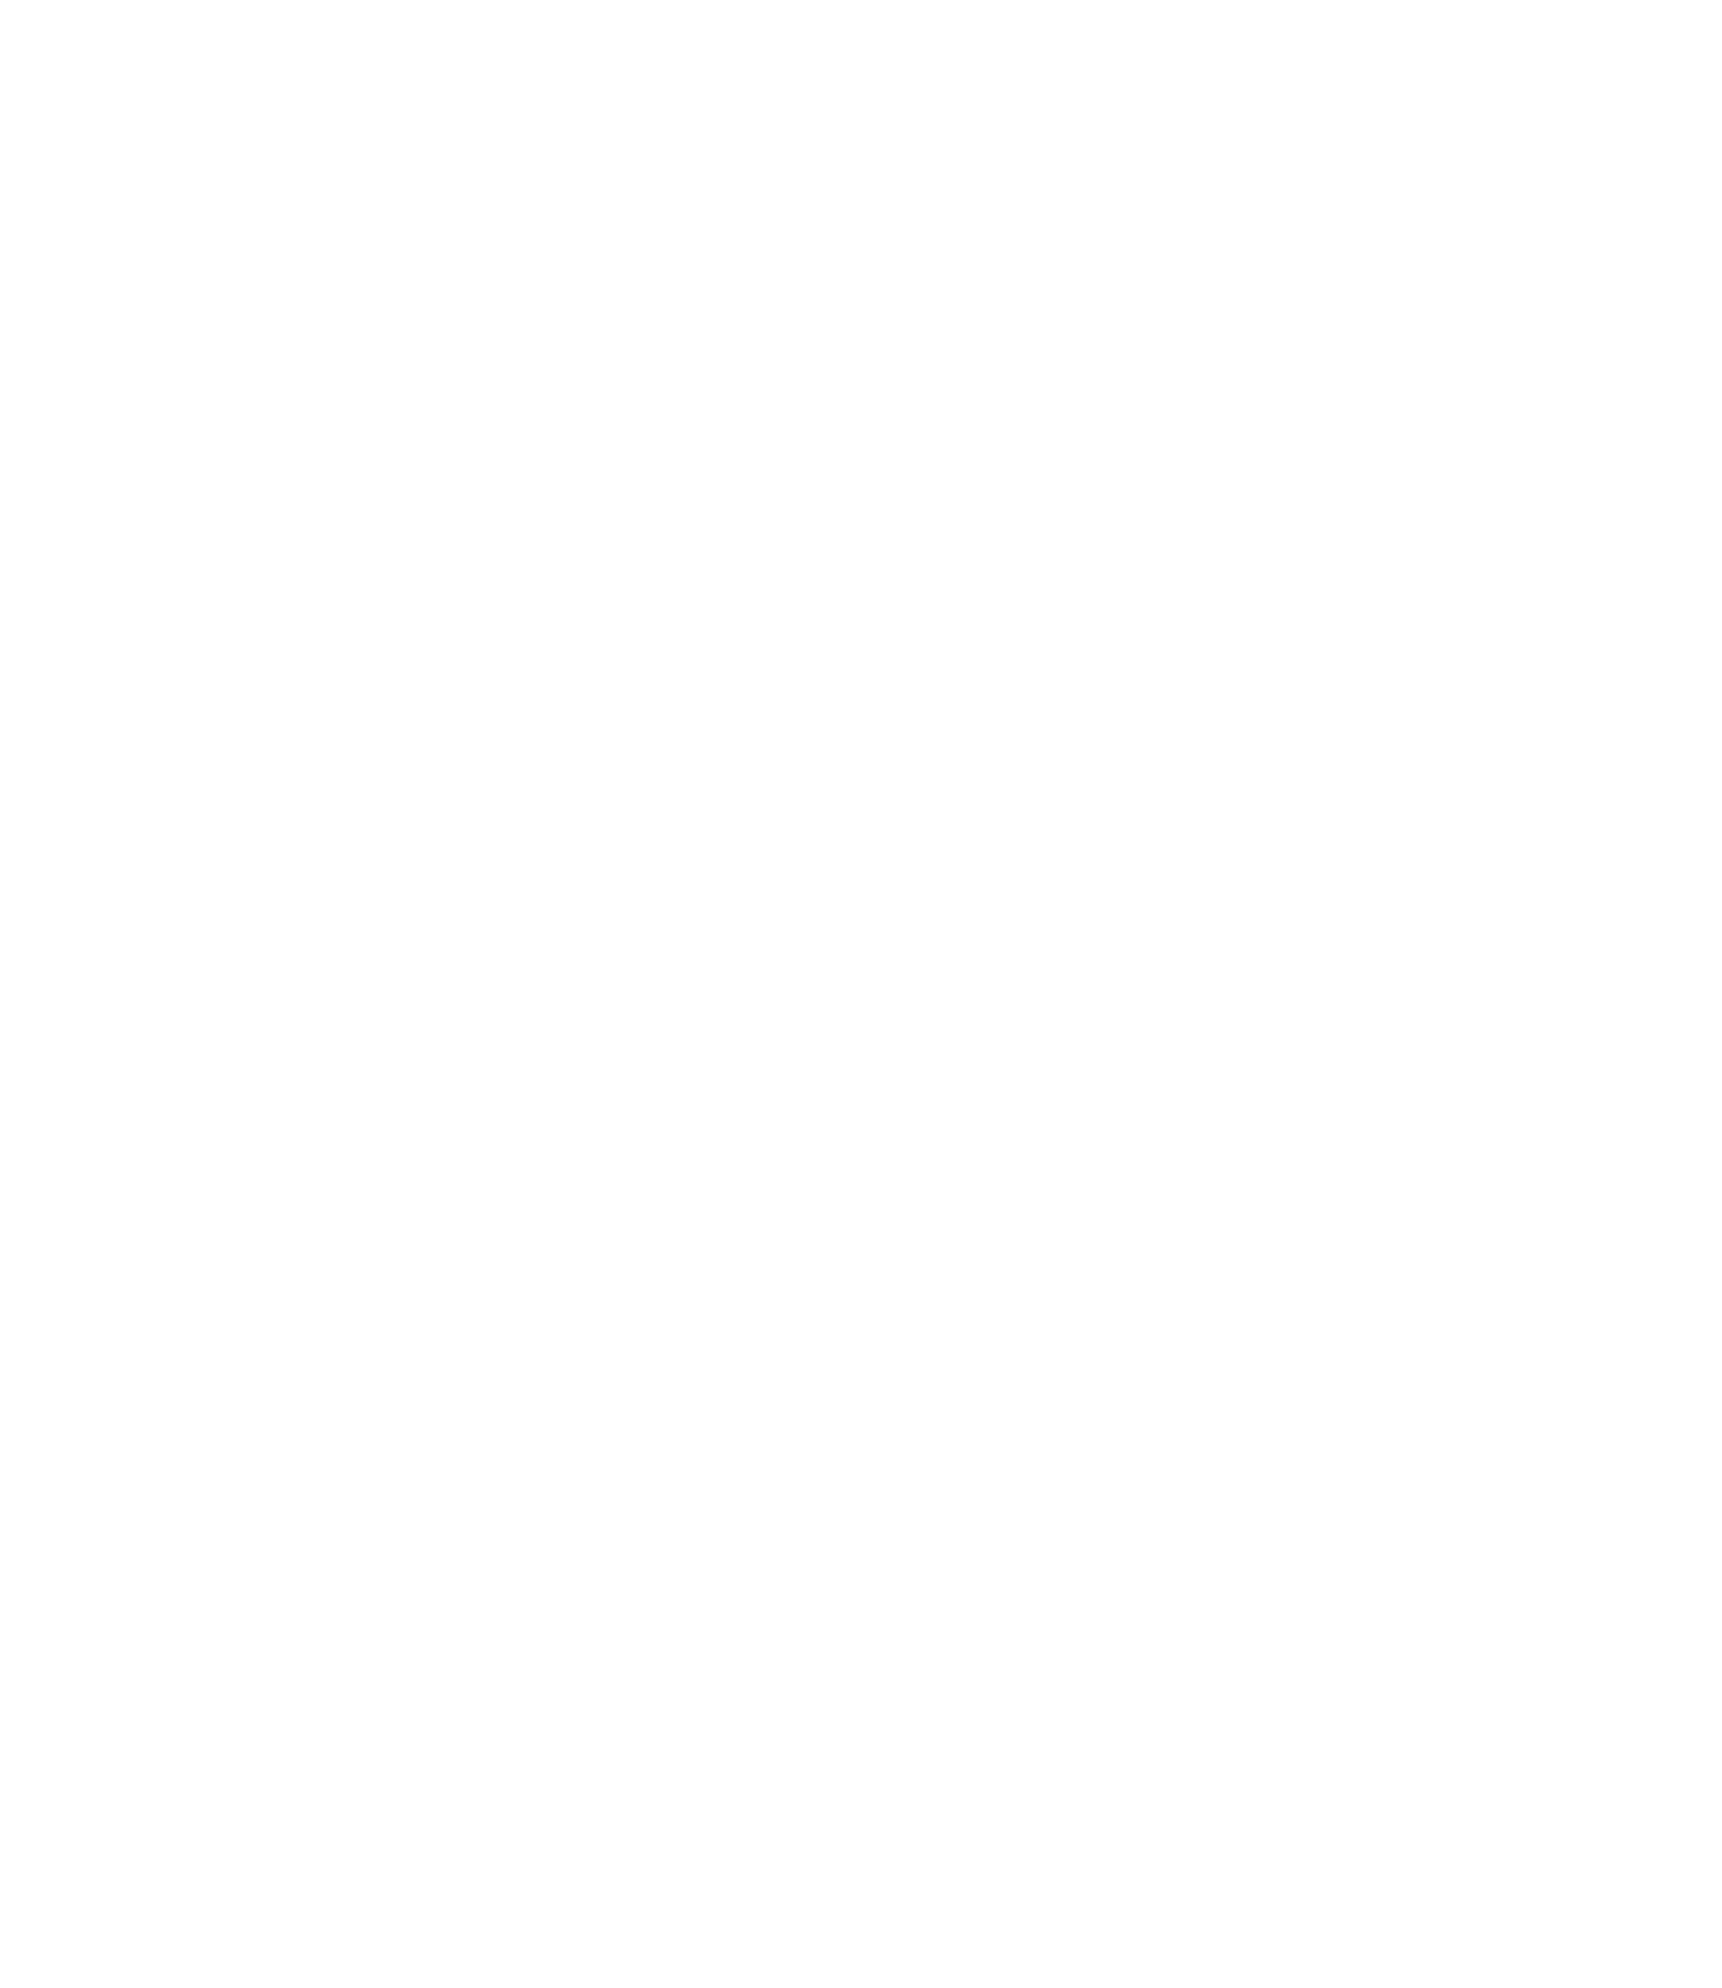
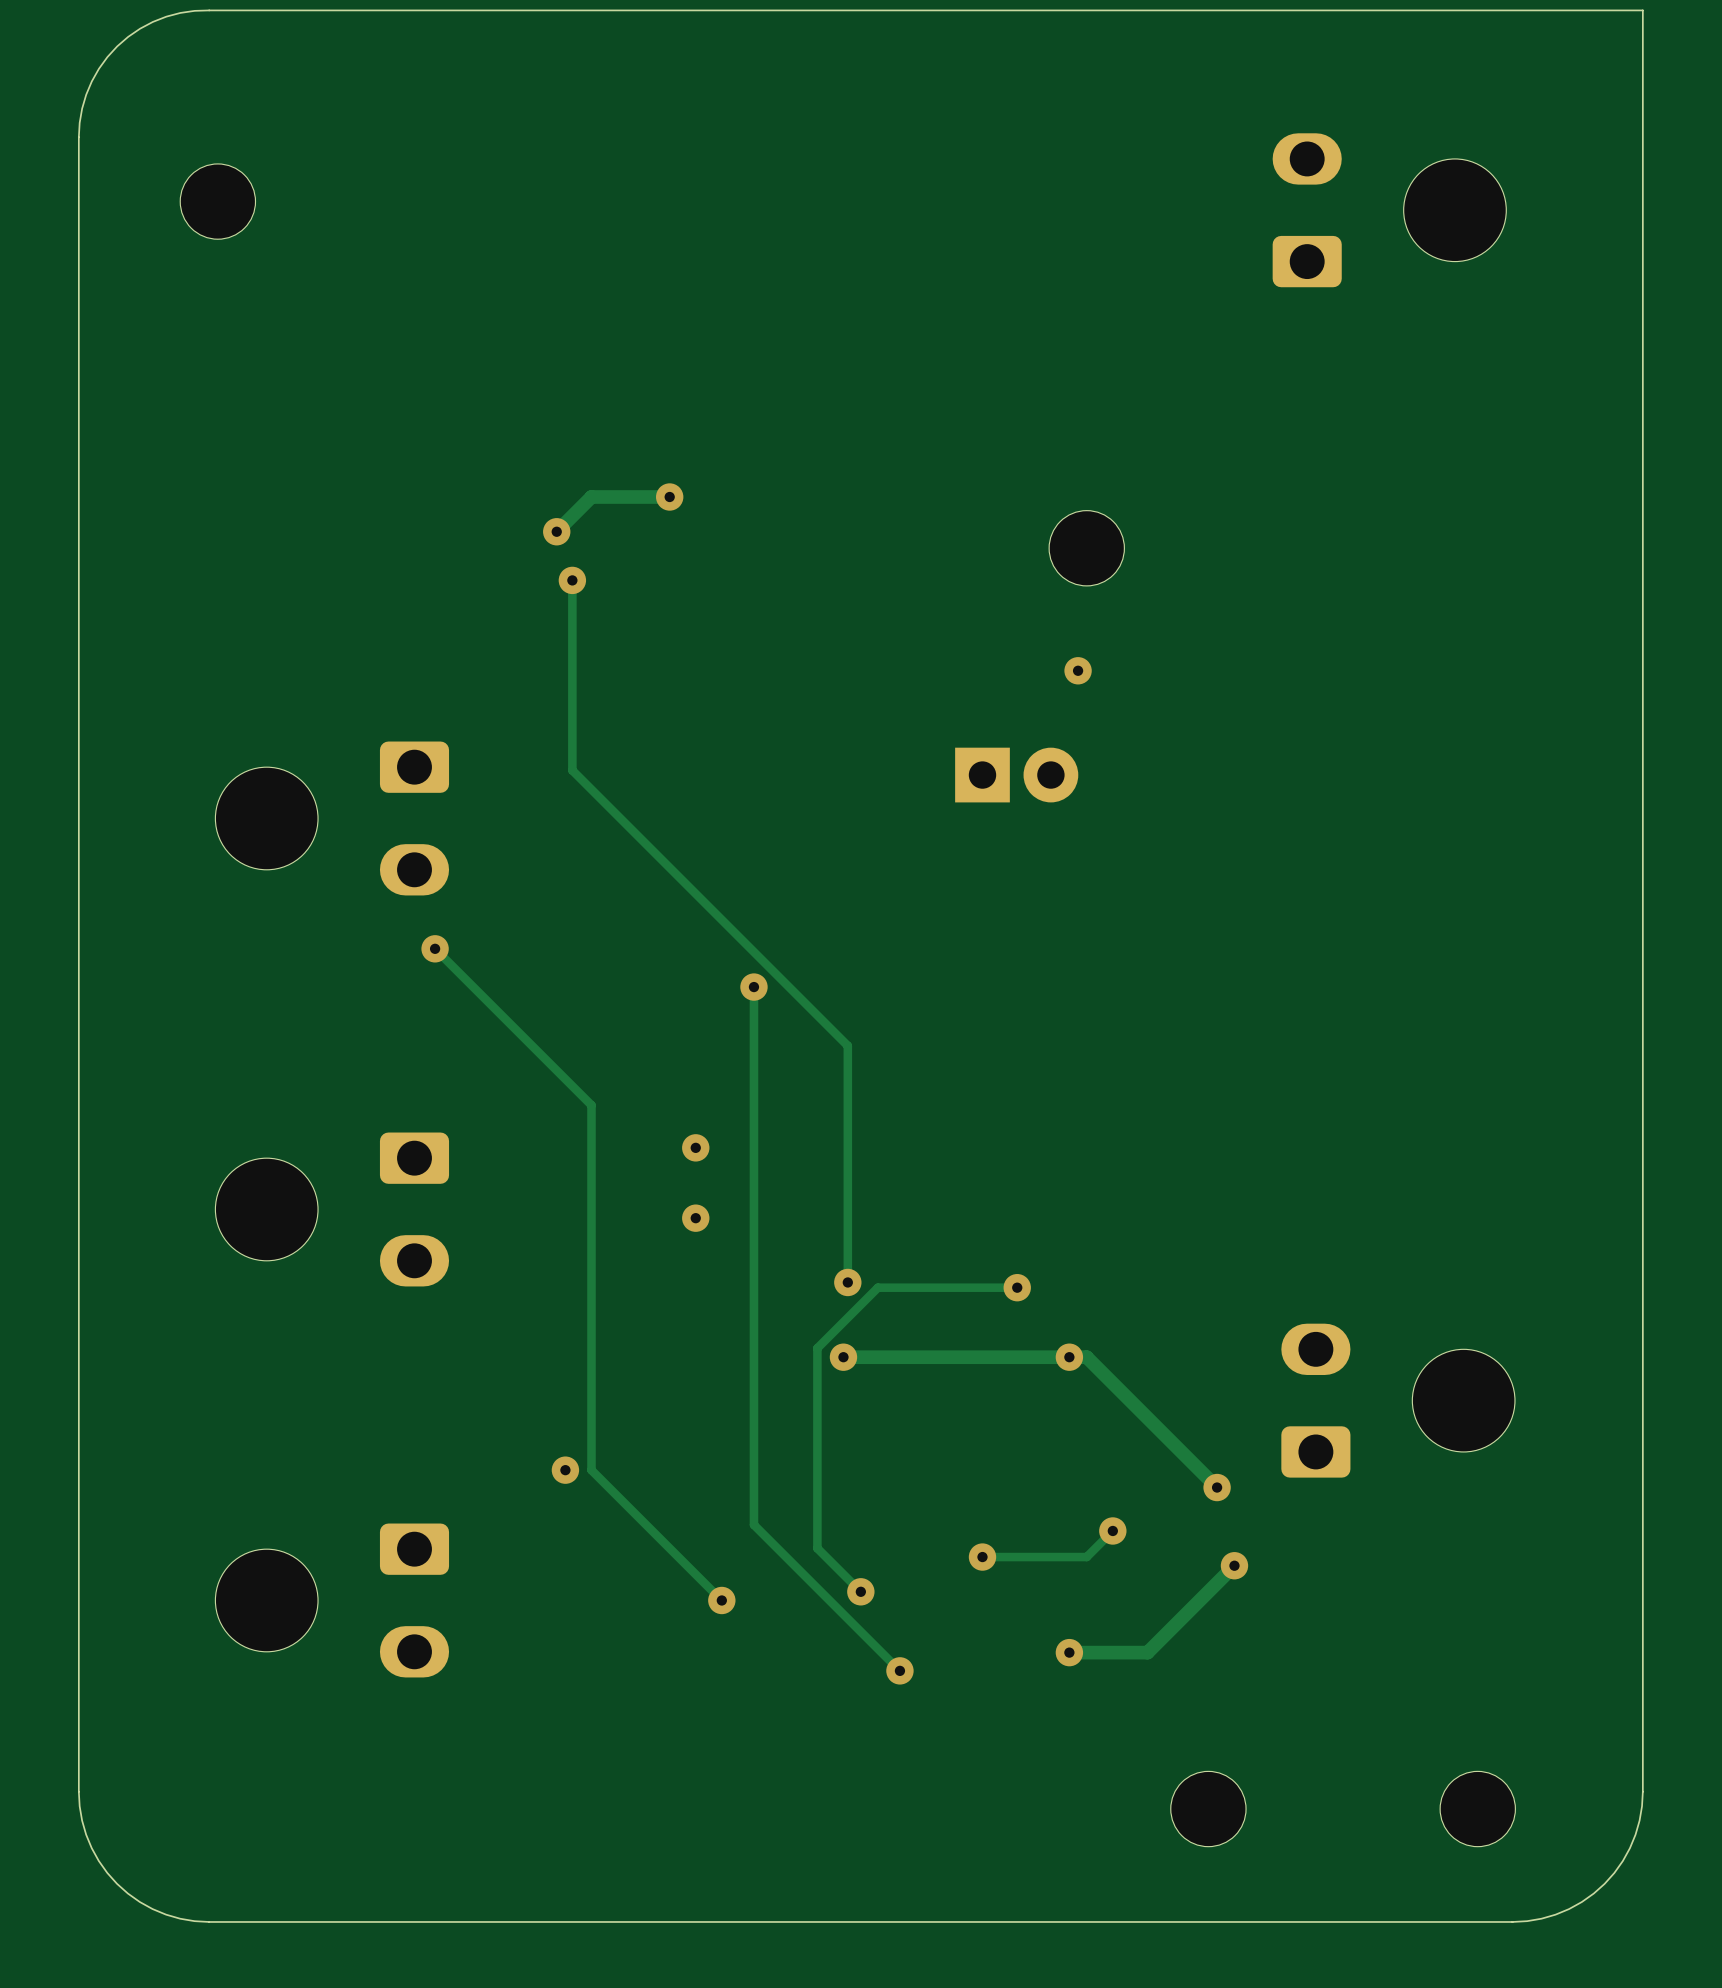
board edge: none -> (1642, 10) (209, 10) (180, 12) (152, 21) (128, 36) (107, 57) (91, 81) (86, 94) (82, 108) (78, 137) (78, 1791) (82, 1820) (91, 1848) (107, 1872) (127, 1893) (152, 1909) (166, 1914) (180, 1918) (209, 1921) (1512, 1921) (1541, 1918) (1569, 1909) (1593, 1893) (1614, 1872) (1629, 1848) (1635, 1834) (1642, 1806) (1642, 1791) (1642, 10)
part: none -> (217, 201)
part: none -> (1389, 210)
track: none -> (669, 497) (591, 497) (556, 531)
via: none -> (669, 497)
via: none -> (556, 531)
part: none -> (1086, 548)
track: none -> (572, 580) (572, 770) (847, 1045) (847, 1282)
via: none -> (572, 580)
via: none -> (1078, 670)
part: none -> (1016, 775)
part: none -> (332, 818)
track: none -> (435, 948) (591, 1105) (591, 1470) (721, 1600)
via: none -> (435, 948)
track: none -> (753, 987) (753, 1524) (899, 1670)
via: none -> (753, 987)
via: none -> (695, 1147)
part: none -> (332, 1209)
via: none -> (695, 1218)
via: none -> (847, 1282)
track: none -> (1017, 1287) (877, 1287) (817, 1348) (817, 1548) (860, 1591)
via: none -> (1017, 1287)
track: none -> (843, 1357) (1086, 1357) (1217, 1487)
via: none -> (843, 1357)
via: none -> (1069, 1357)
part: none -> (1398, 1400)
via: none -> (565, 1470)
via: none -> (1217, 1487)
track: none -> (1112, 1530) (1086, 1557) (982, 1557)
via: none -> (1112, 1530)
via: none -> (982, 1557)
track: none -> (1234, 1565) (1147, 1652) (1069, 1652)
via: none -> (1234, 1565)
via: none -> (860, 1591)
part: none -> (332, 1600)
via: none -> (721, 1600)
via: none -> (1069, 1652)
via: none -> (899, 1670)
part: none -> (1208, 1809)
part: none -> (1477, 1809)

